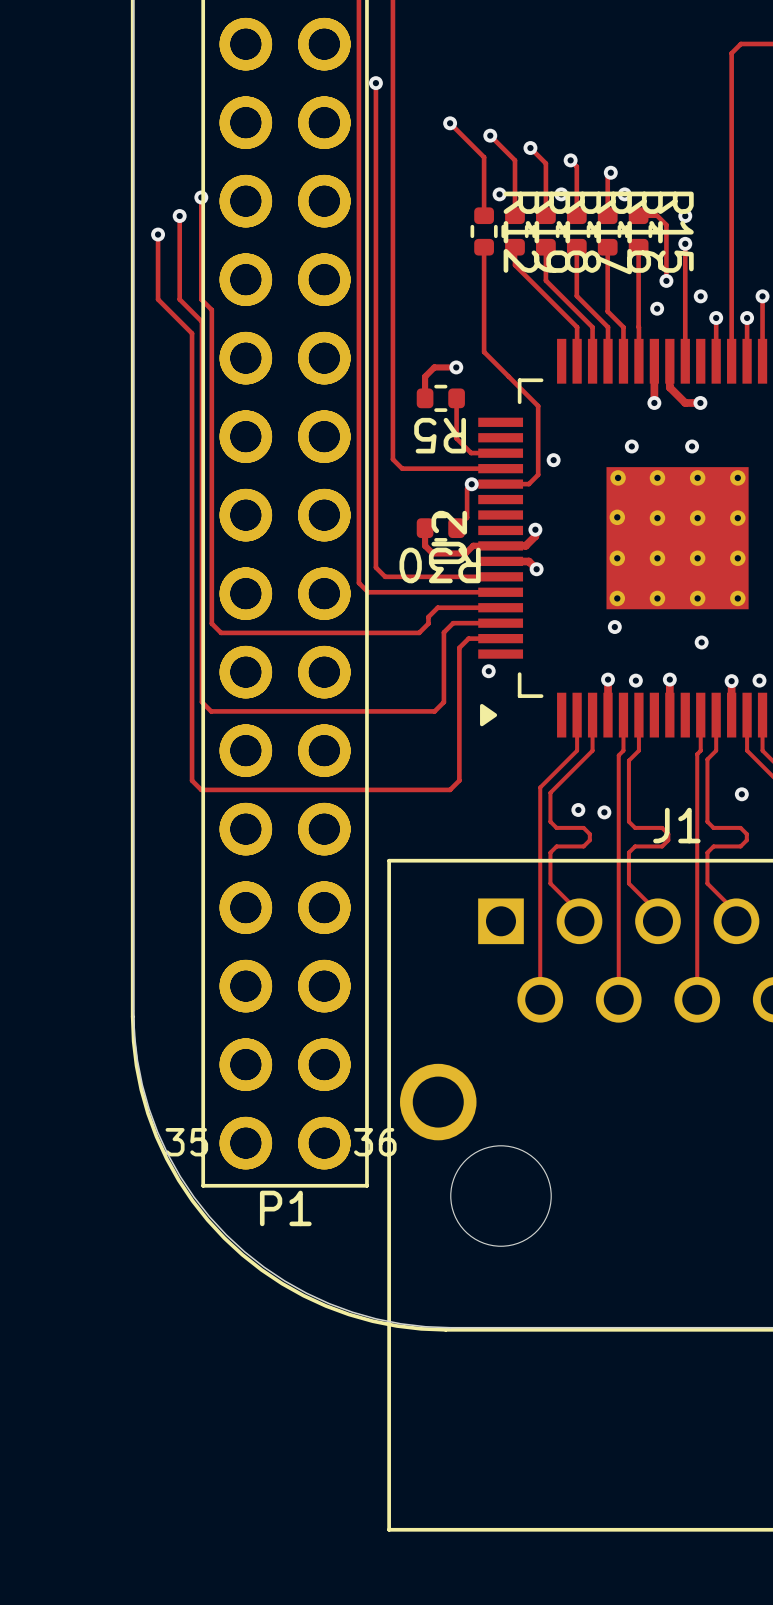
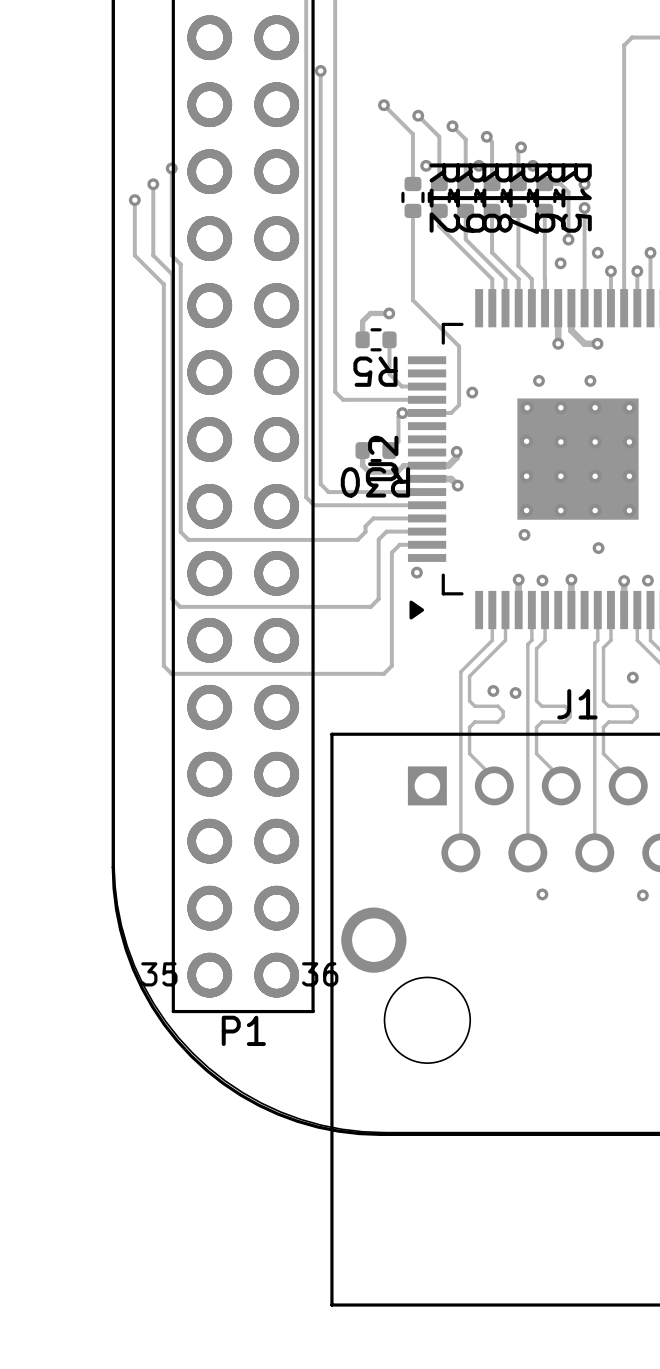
via: none -> (542, 894)
via: none -> (642, 895)

